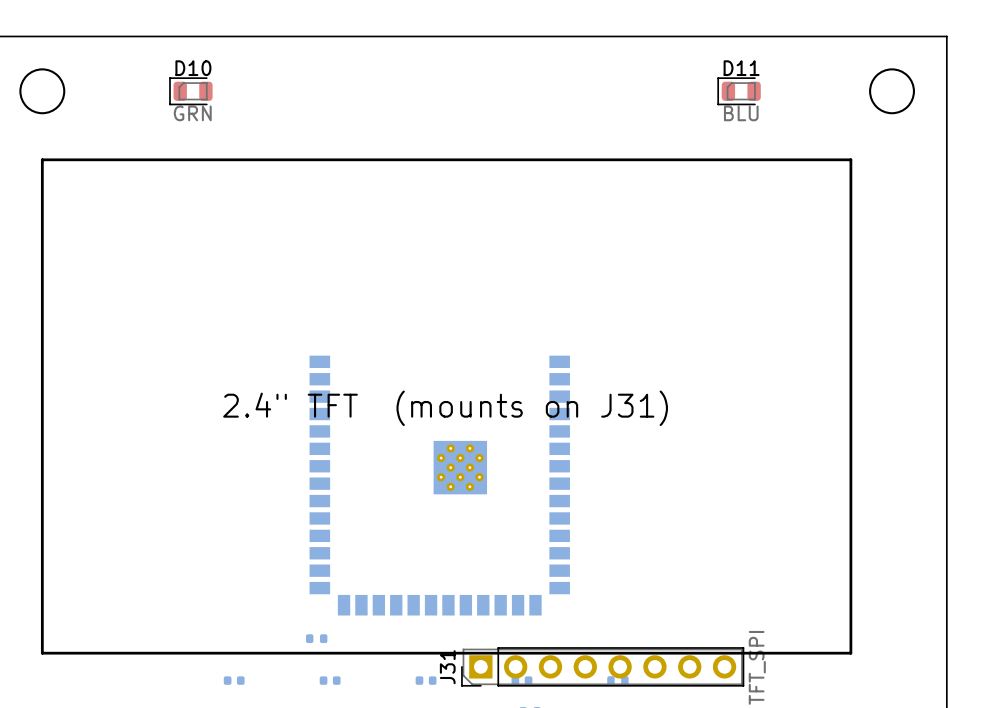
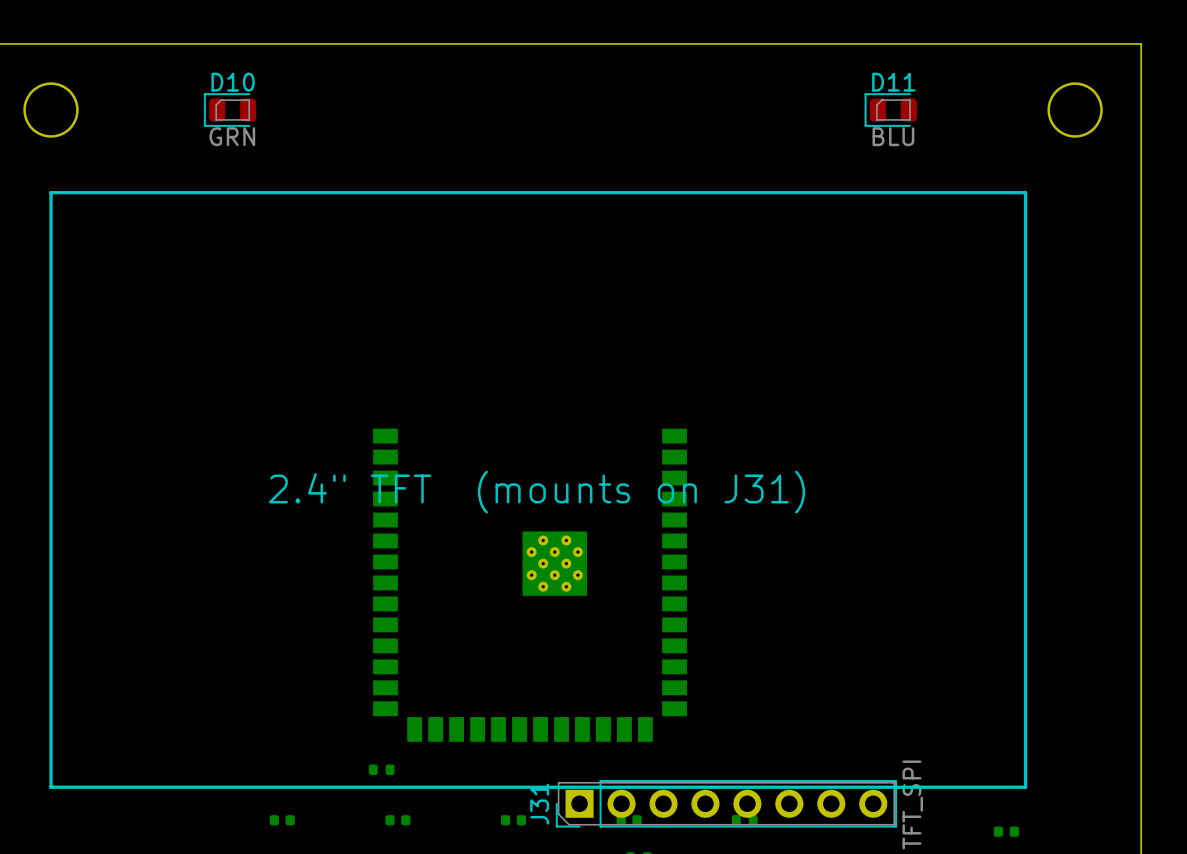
part: none -> (1006, 831)

